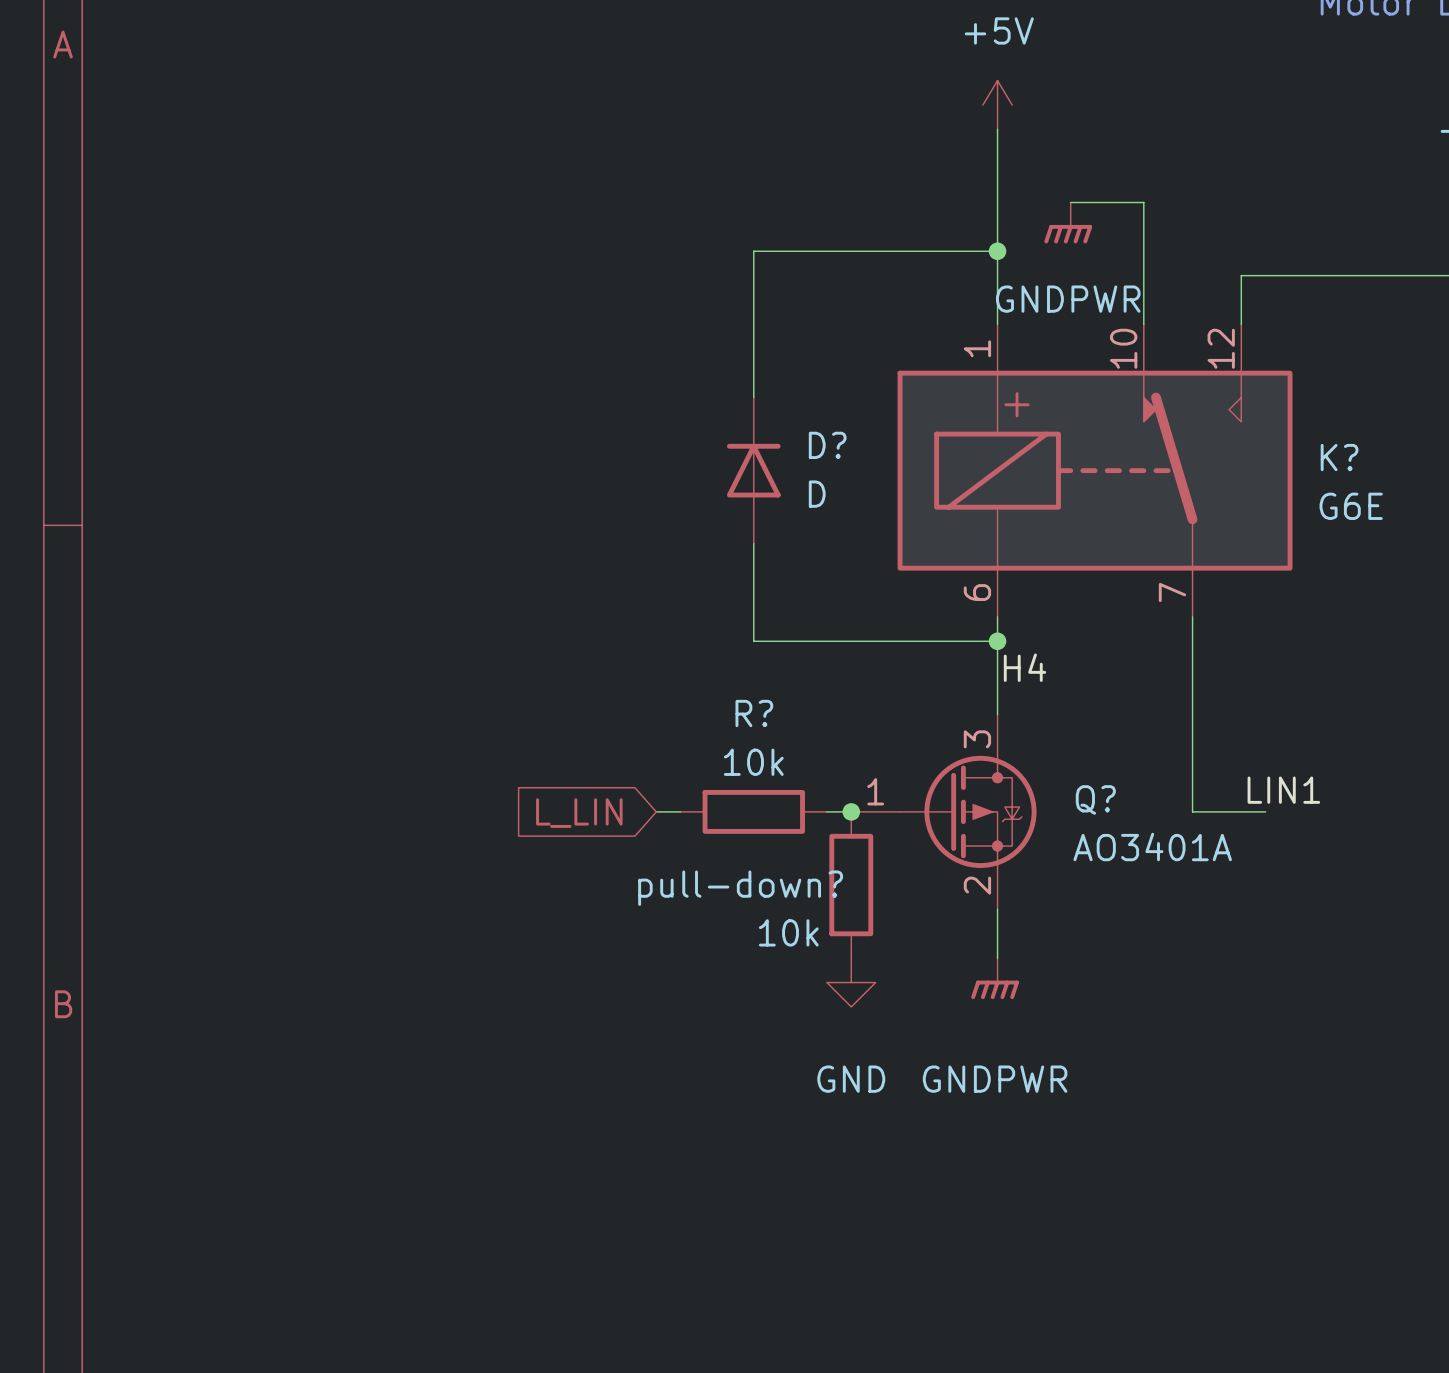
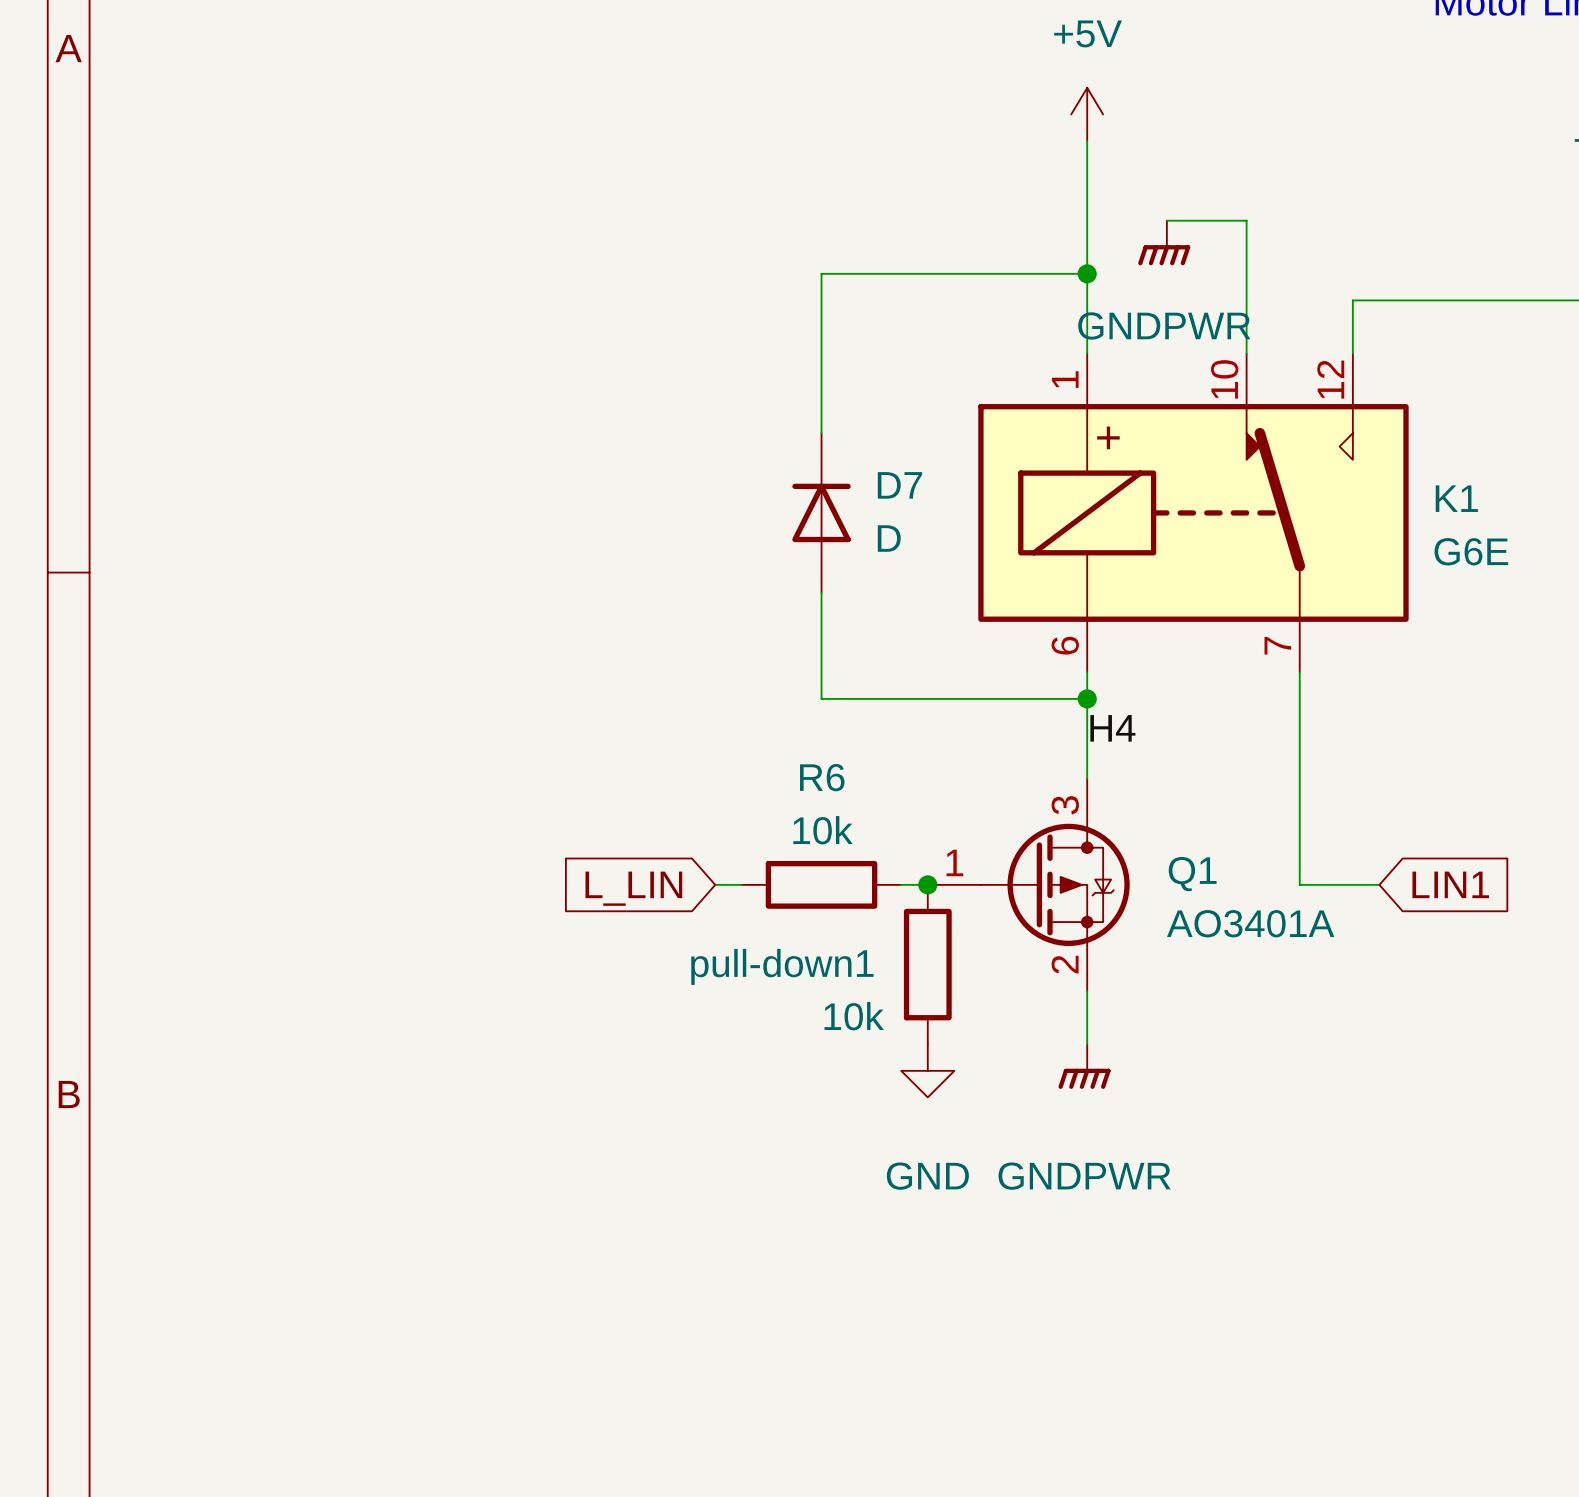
D? name: D? (827, 445) -> D7 (899, 485)
K? name: K? (1339, 457) -> K1 (1456, 498)
R? name: R? (754, 713) -> R6 (822, 777)
label: LIN1 (1283, 790) -> none
Q? name: Q? (1095, 799) -> Q1 (1192, 874)
global label: none -> LIN1 (1450, 884)
pull-down? name: pull-down? (740, 888) -> pull-down1 (782, 966)

